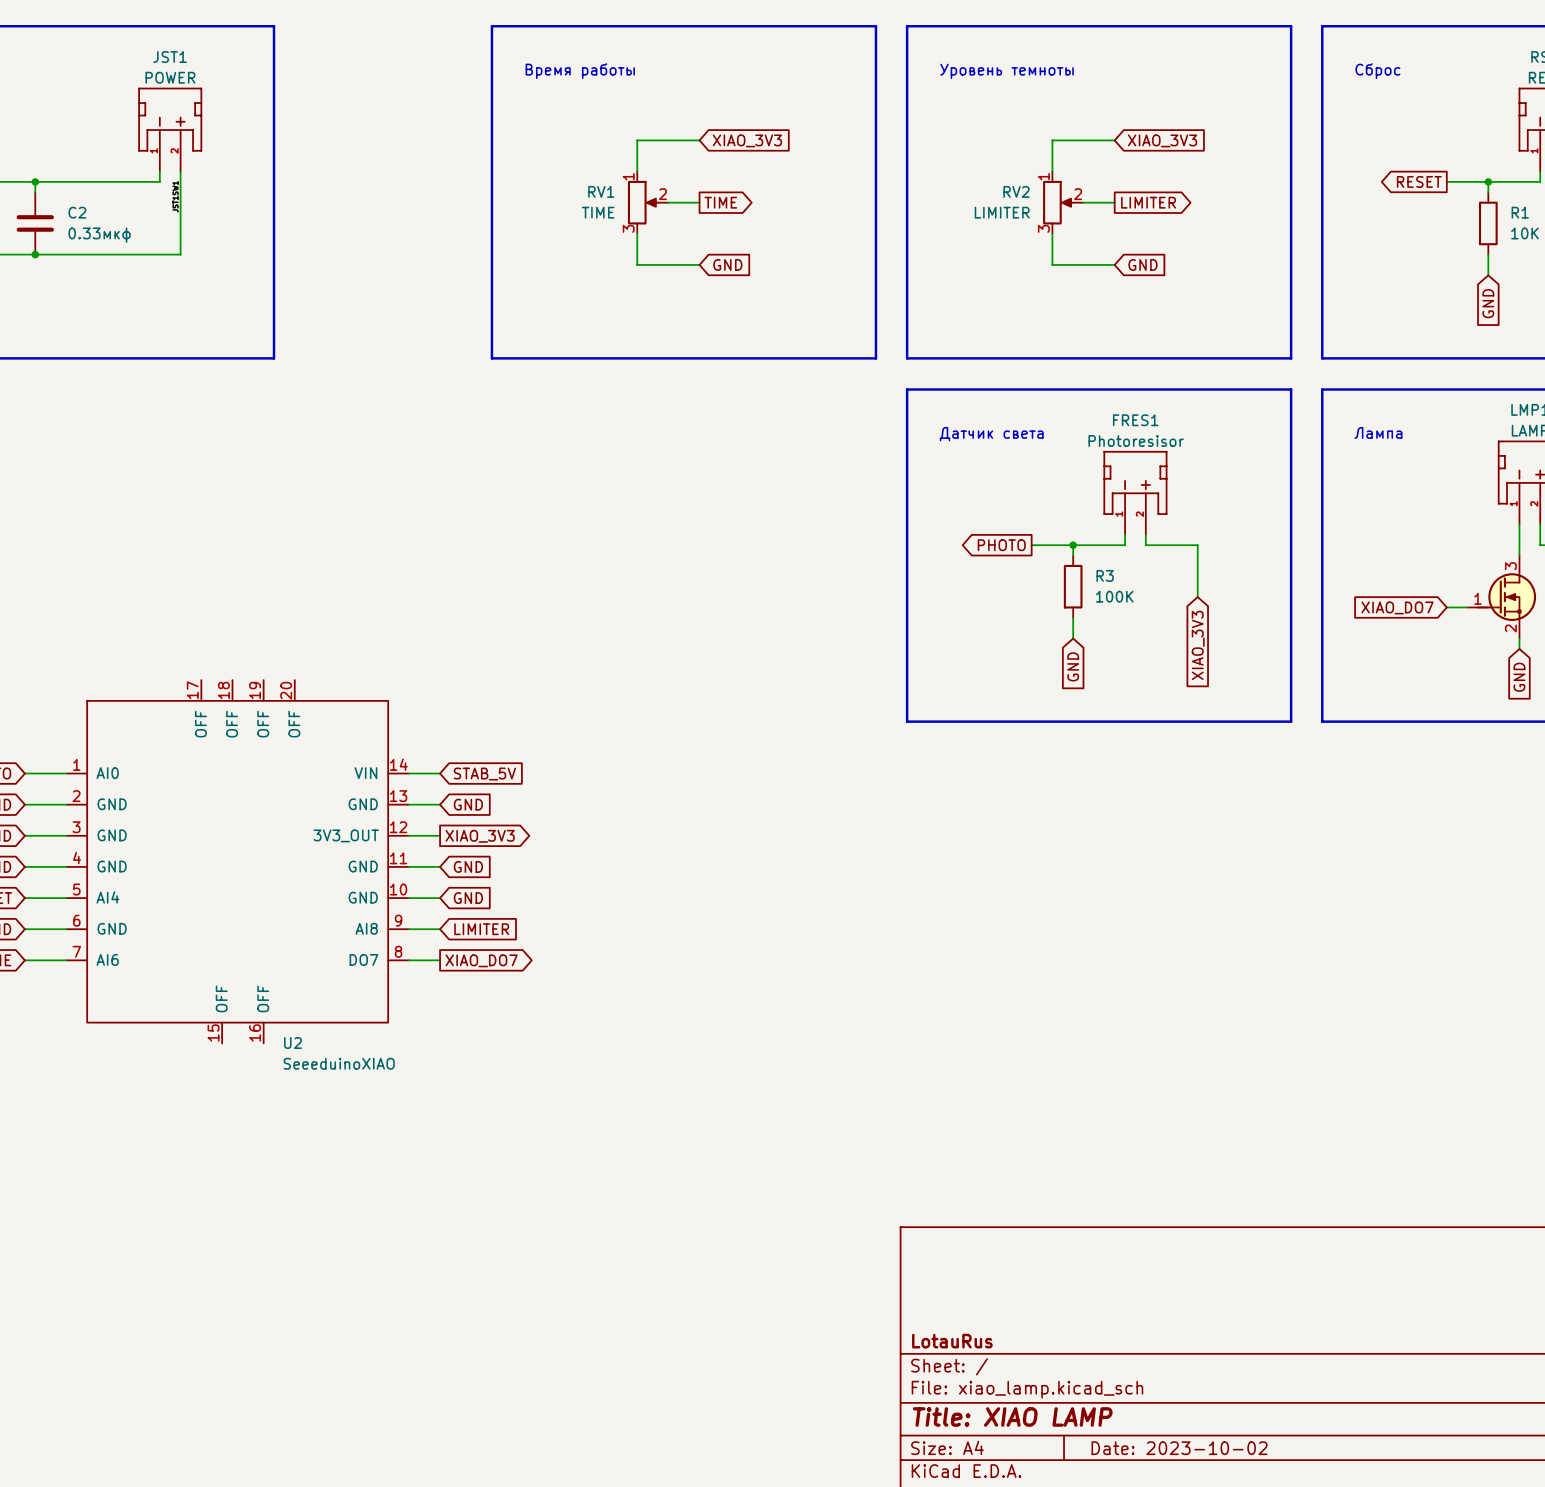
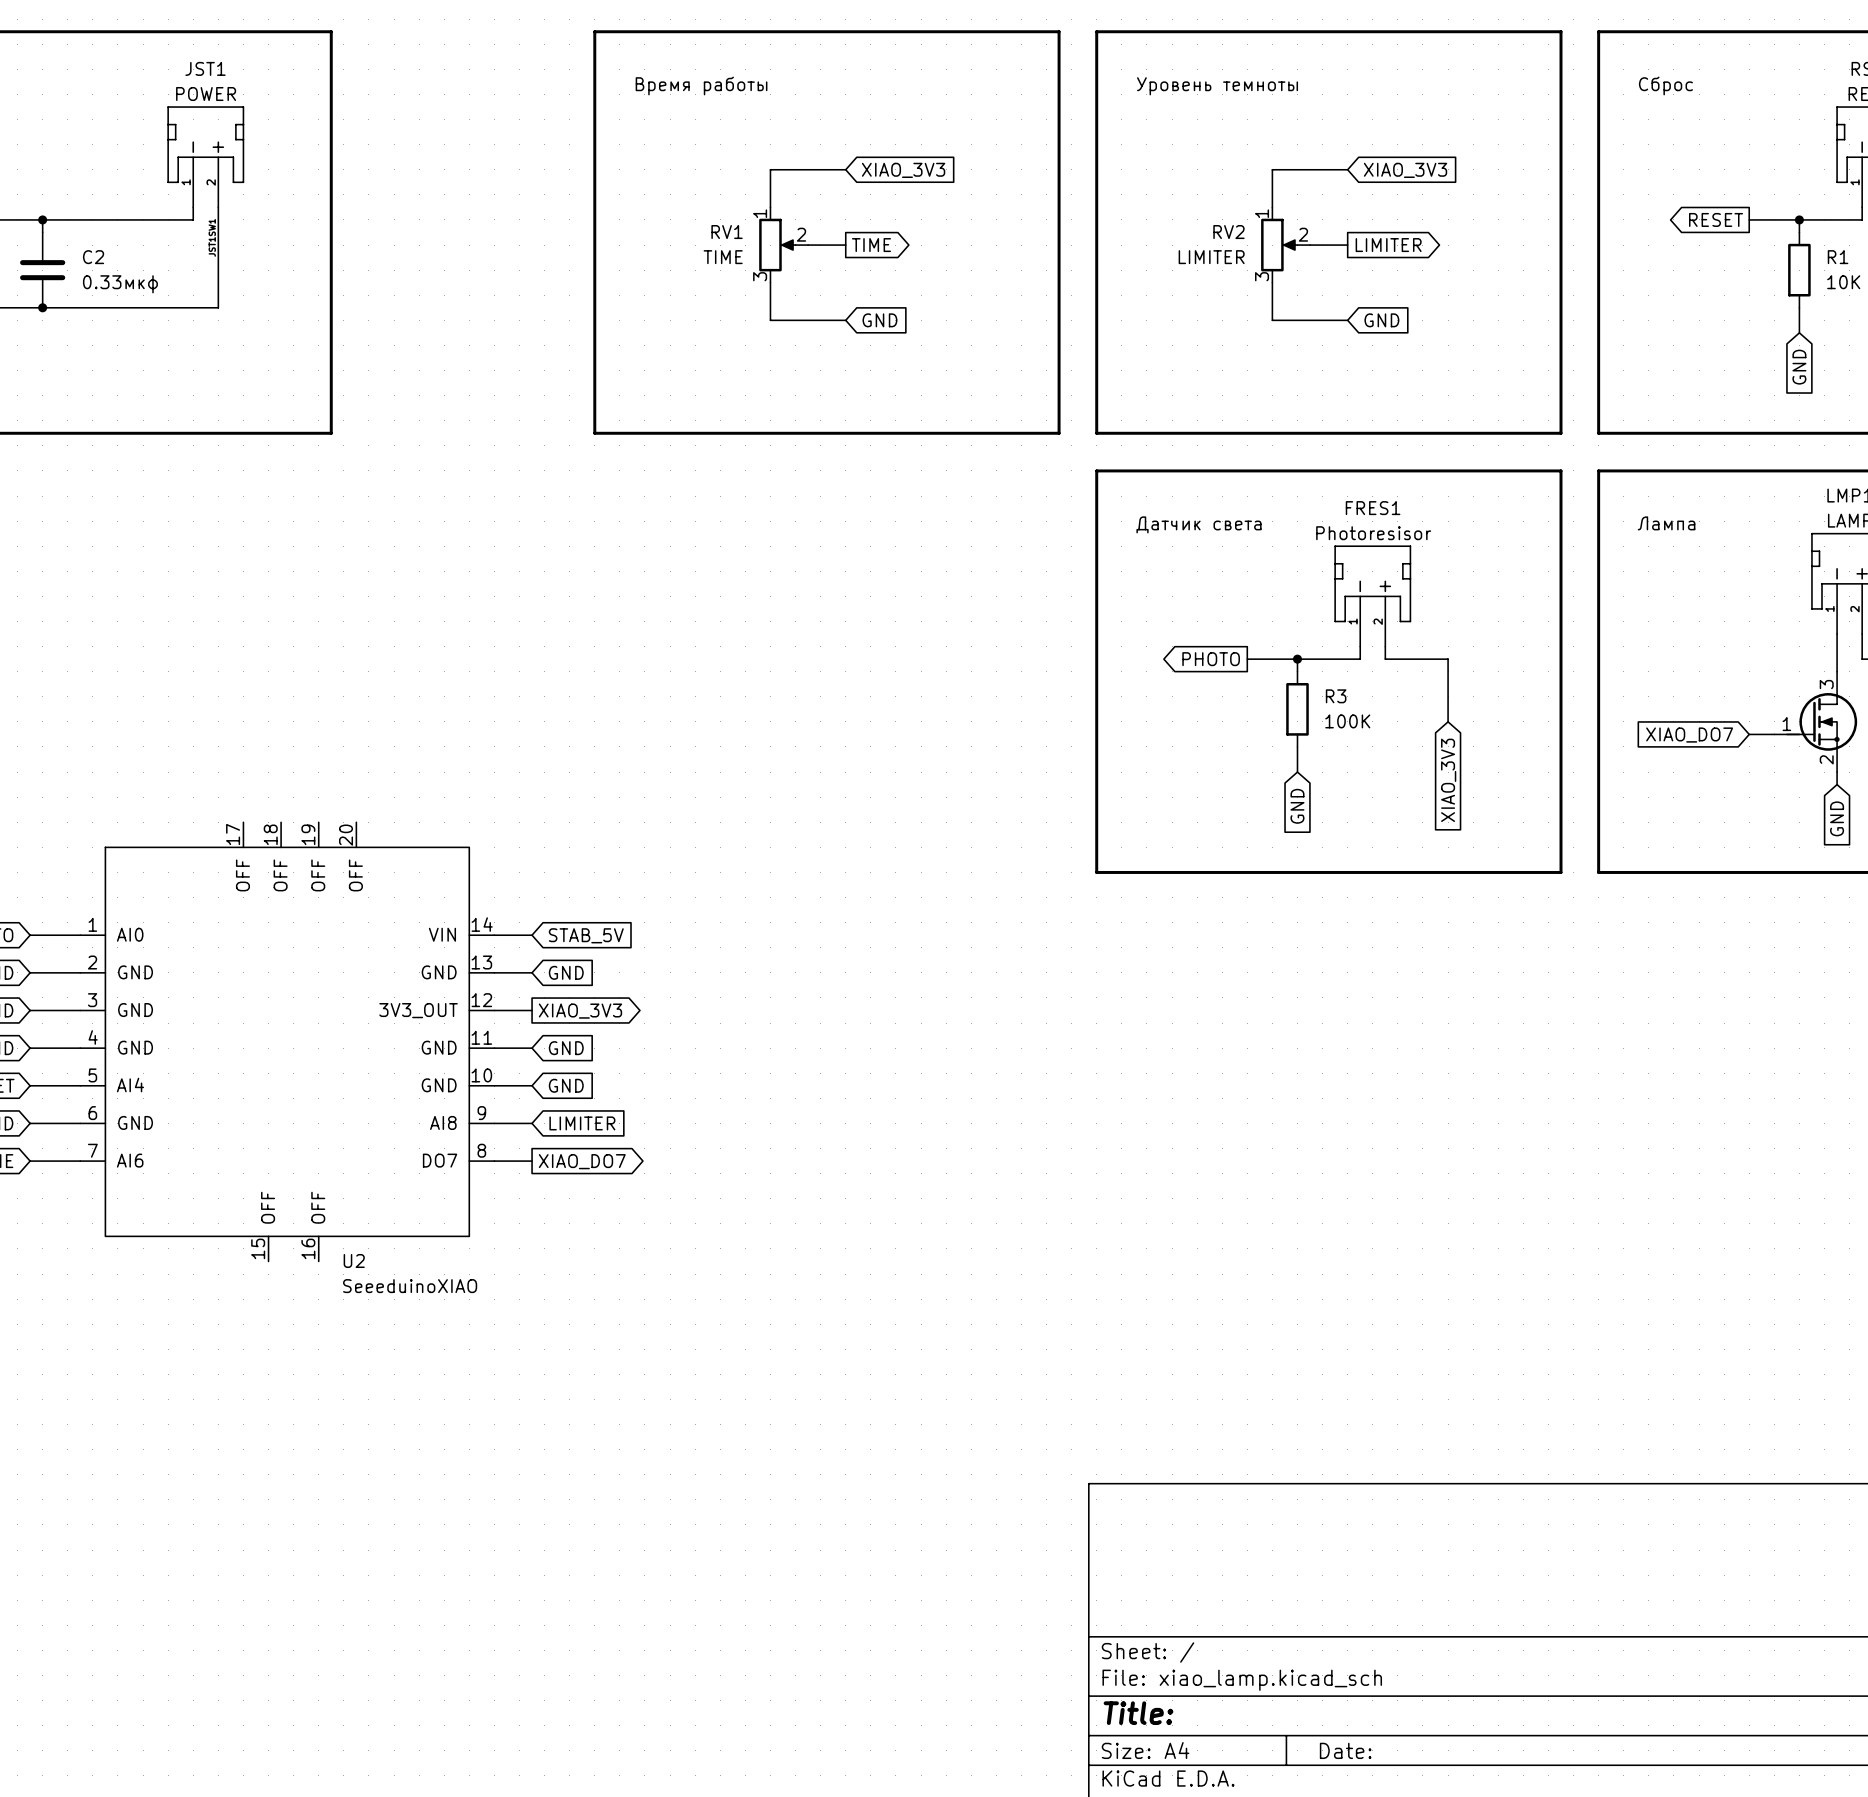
title block: LotauRus (952, 1341) -> none
title block: Title: XIAO LAMP (1012, 1416) -> Title: (1138, 1713)
title block: Date: 2023-10-02 (1179, 1448) -> Date: (1345, 1750)

